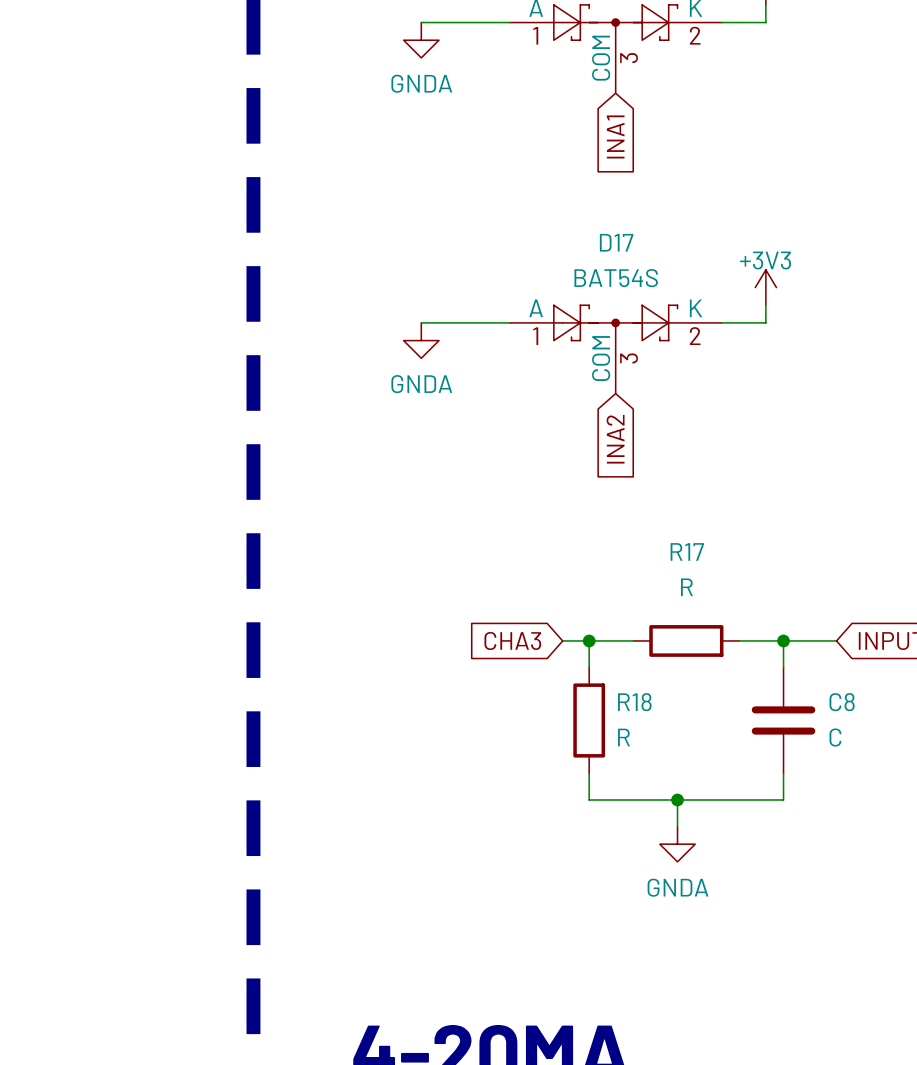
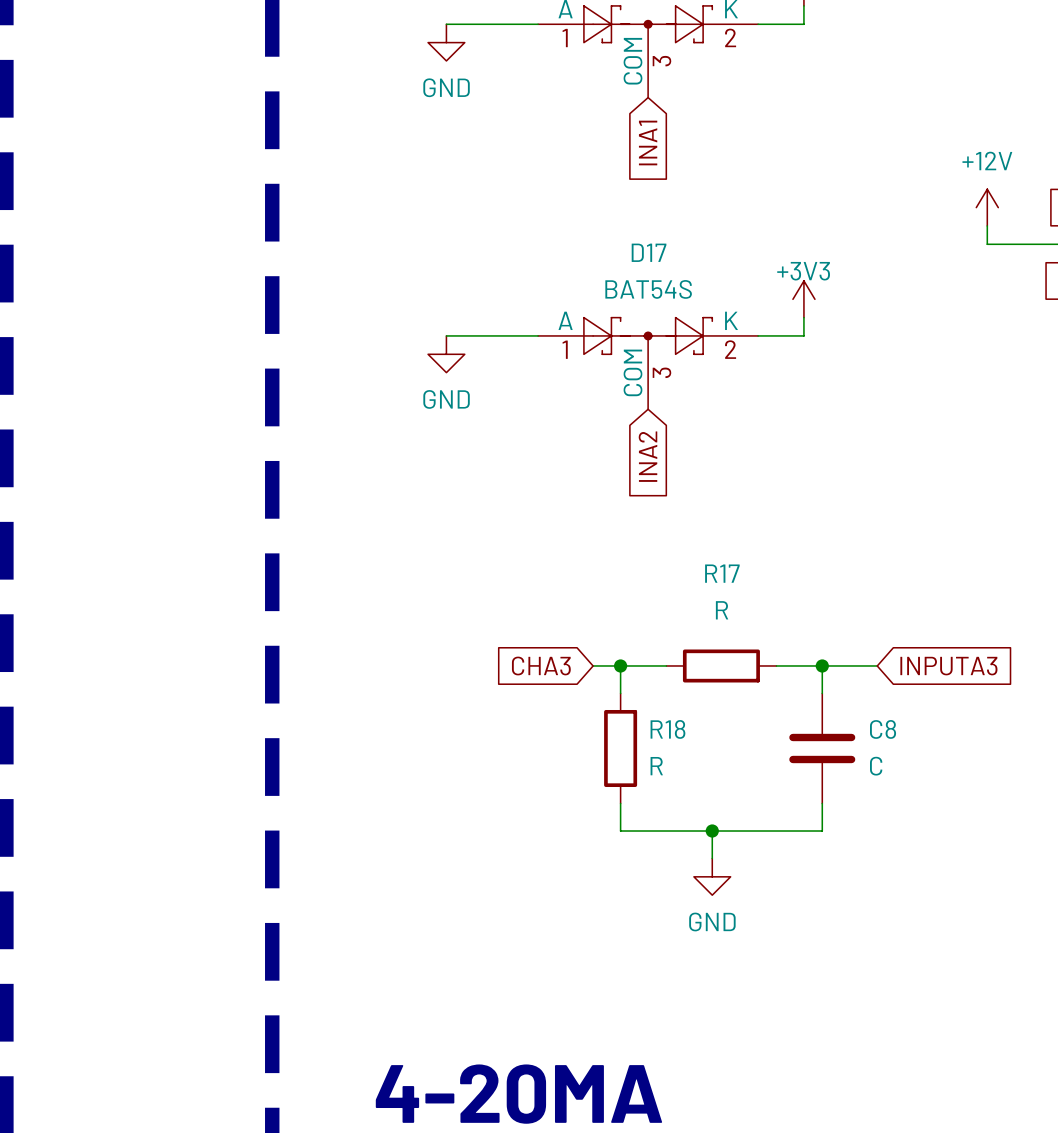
power symbol: GNDA (421, 40) -> GND (446, 42)
power symbol: GNDA (421, 340) -> GND (446, 354)
power symbol: GNDA (677, 844) -> GND (712, 876)

